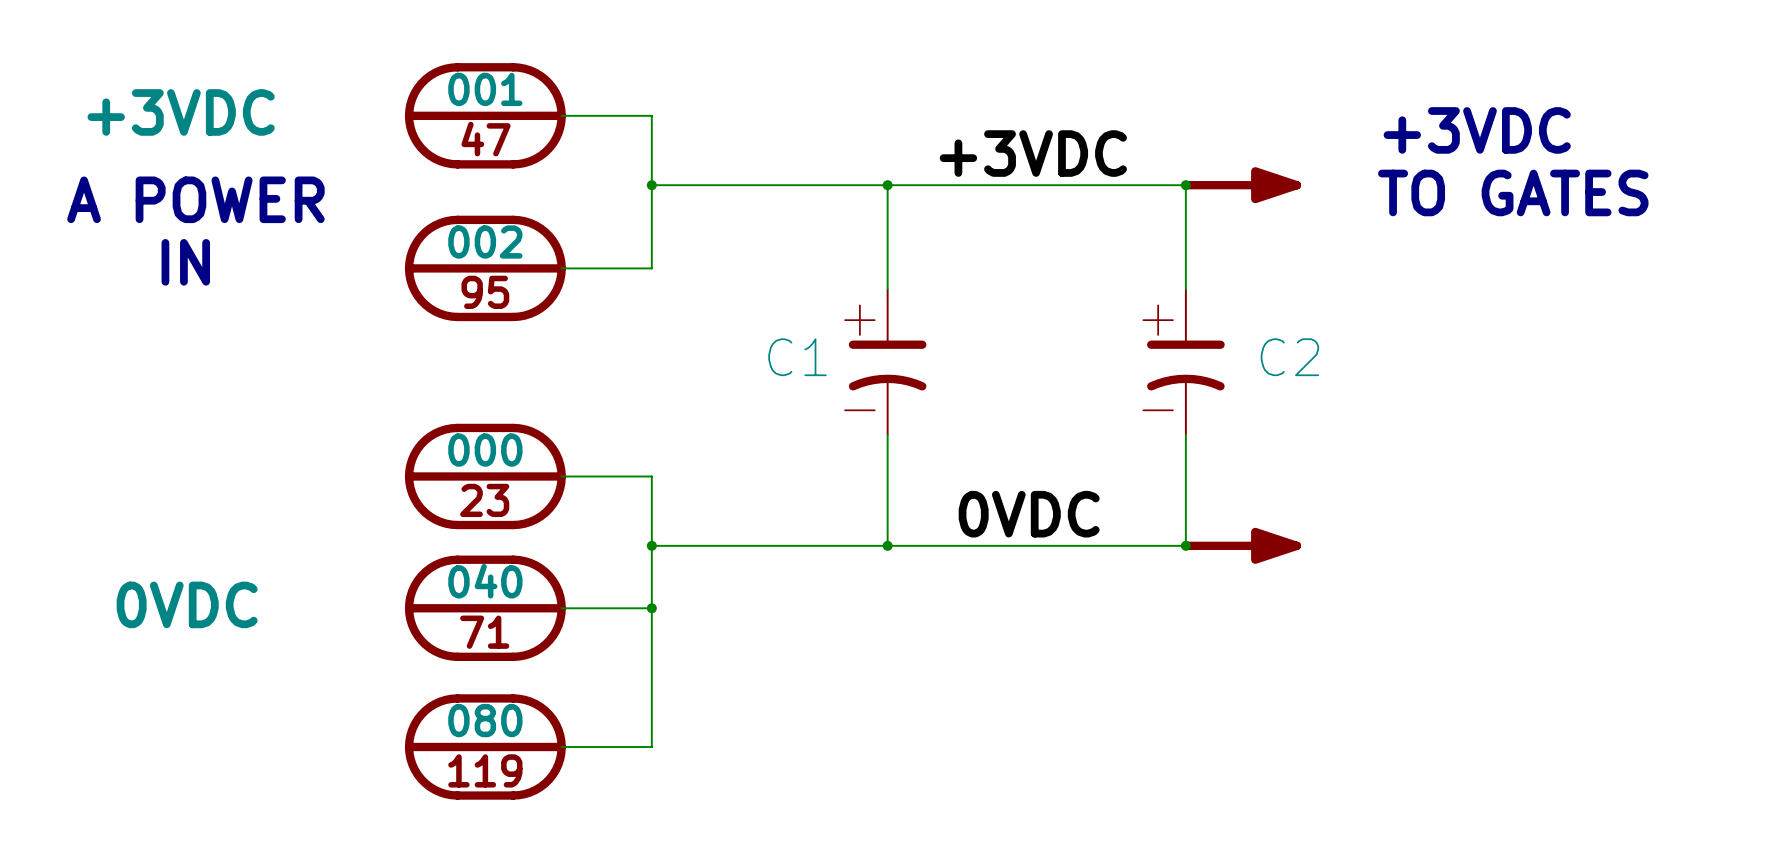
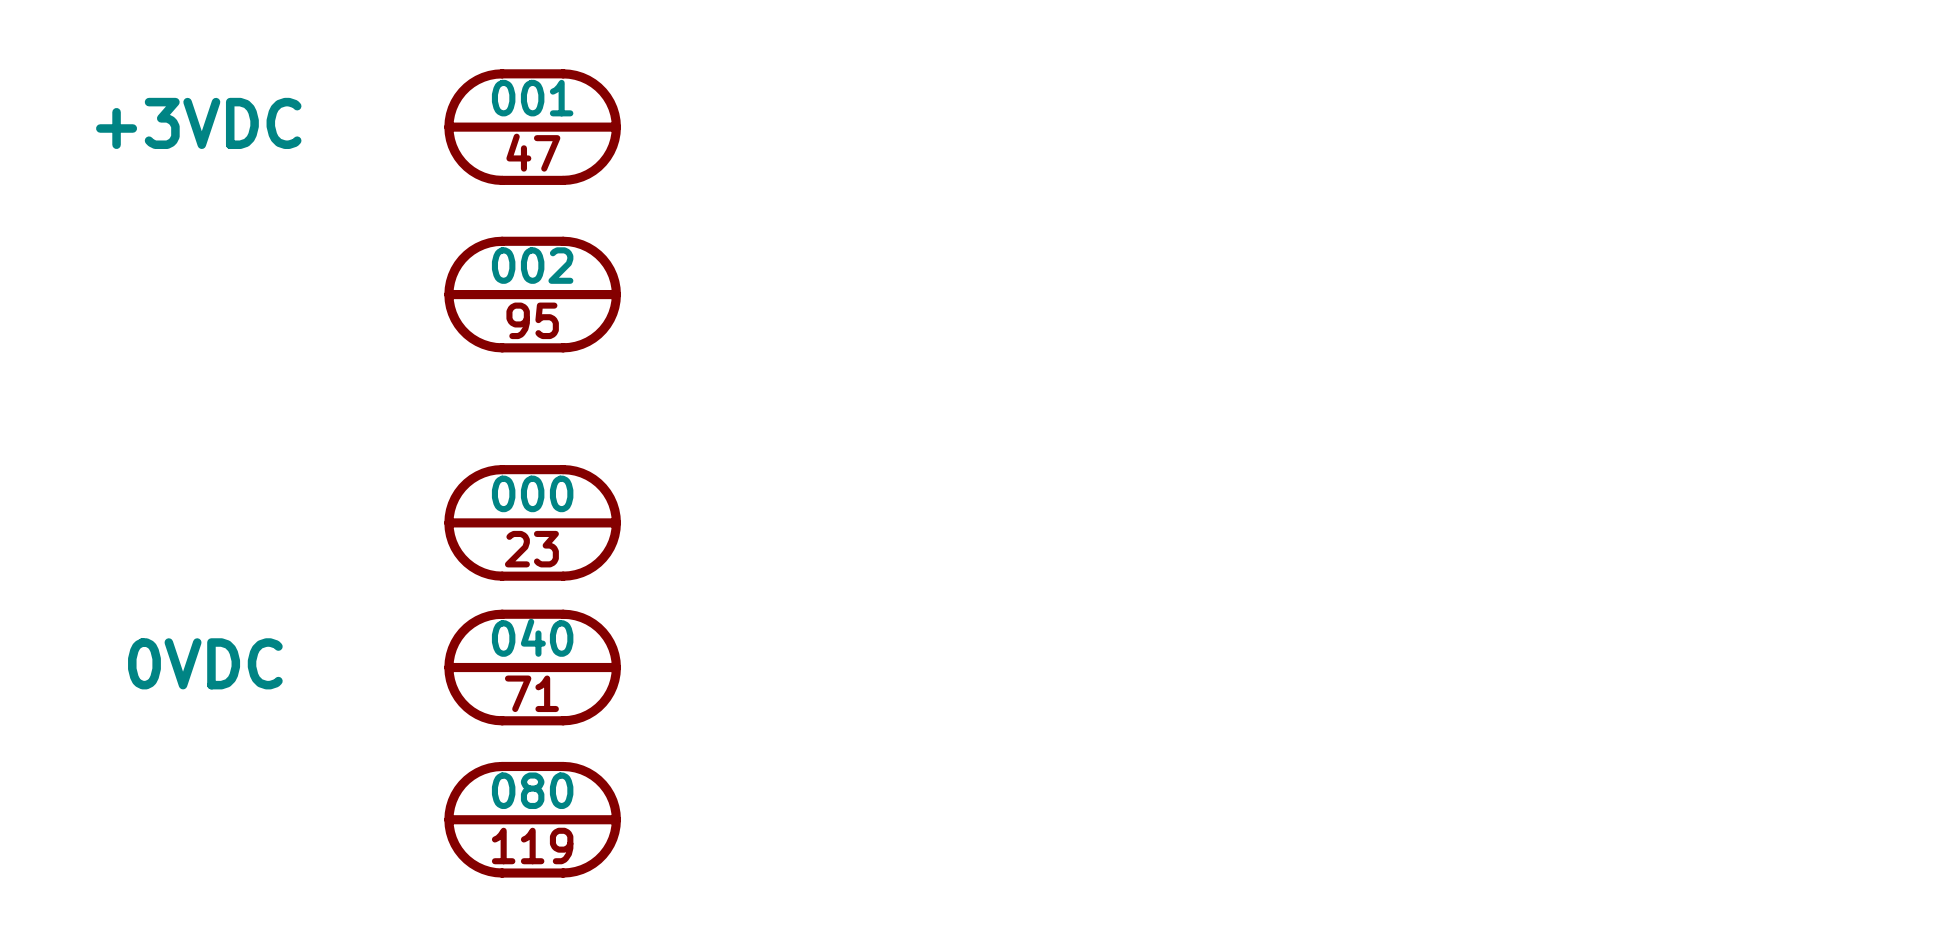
wire: (561, 115) (651, 115) (651, 268) (561, 268) -> none
text: +3VDC (1477, 130) -> none
label: +3VDC (1033, 153) -> none
wire: (651, 185) (1185, 185) (1185, 289) -> none
junction: (651, 185) -> none
wire: (887, 185) (887, 289) -> none
junction: (887, 185) -> none
junction: (1185, 185) -> none
power symbol: (1241, 185) -> none
text: TO GATES (1513, 192) -> none
text: A POWER (195, 199) -> none
text: IN (185, 262) -> none
C1: (887, 362) -> none
C2: (1185, 362) -> none
wire: (887, 434) (887, 545) -> none
wire: (1185, 434) (1185, 545) (651, 545) -> none
wire: (561, 476) (651, 476) (651, 746) (561, 746) -> none
label: 0VDC (1029, 514) -> none
junction: (651, 545) -> none
junction: (887, 545) -> none
junction: (1185, 545) -> none
power symbol: (1241, 545) -> none
wire: (561, 608) (651, 608) -> none
junction: (651, 608) -> none

